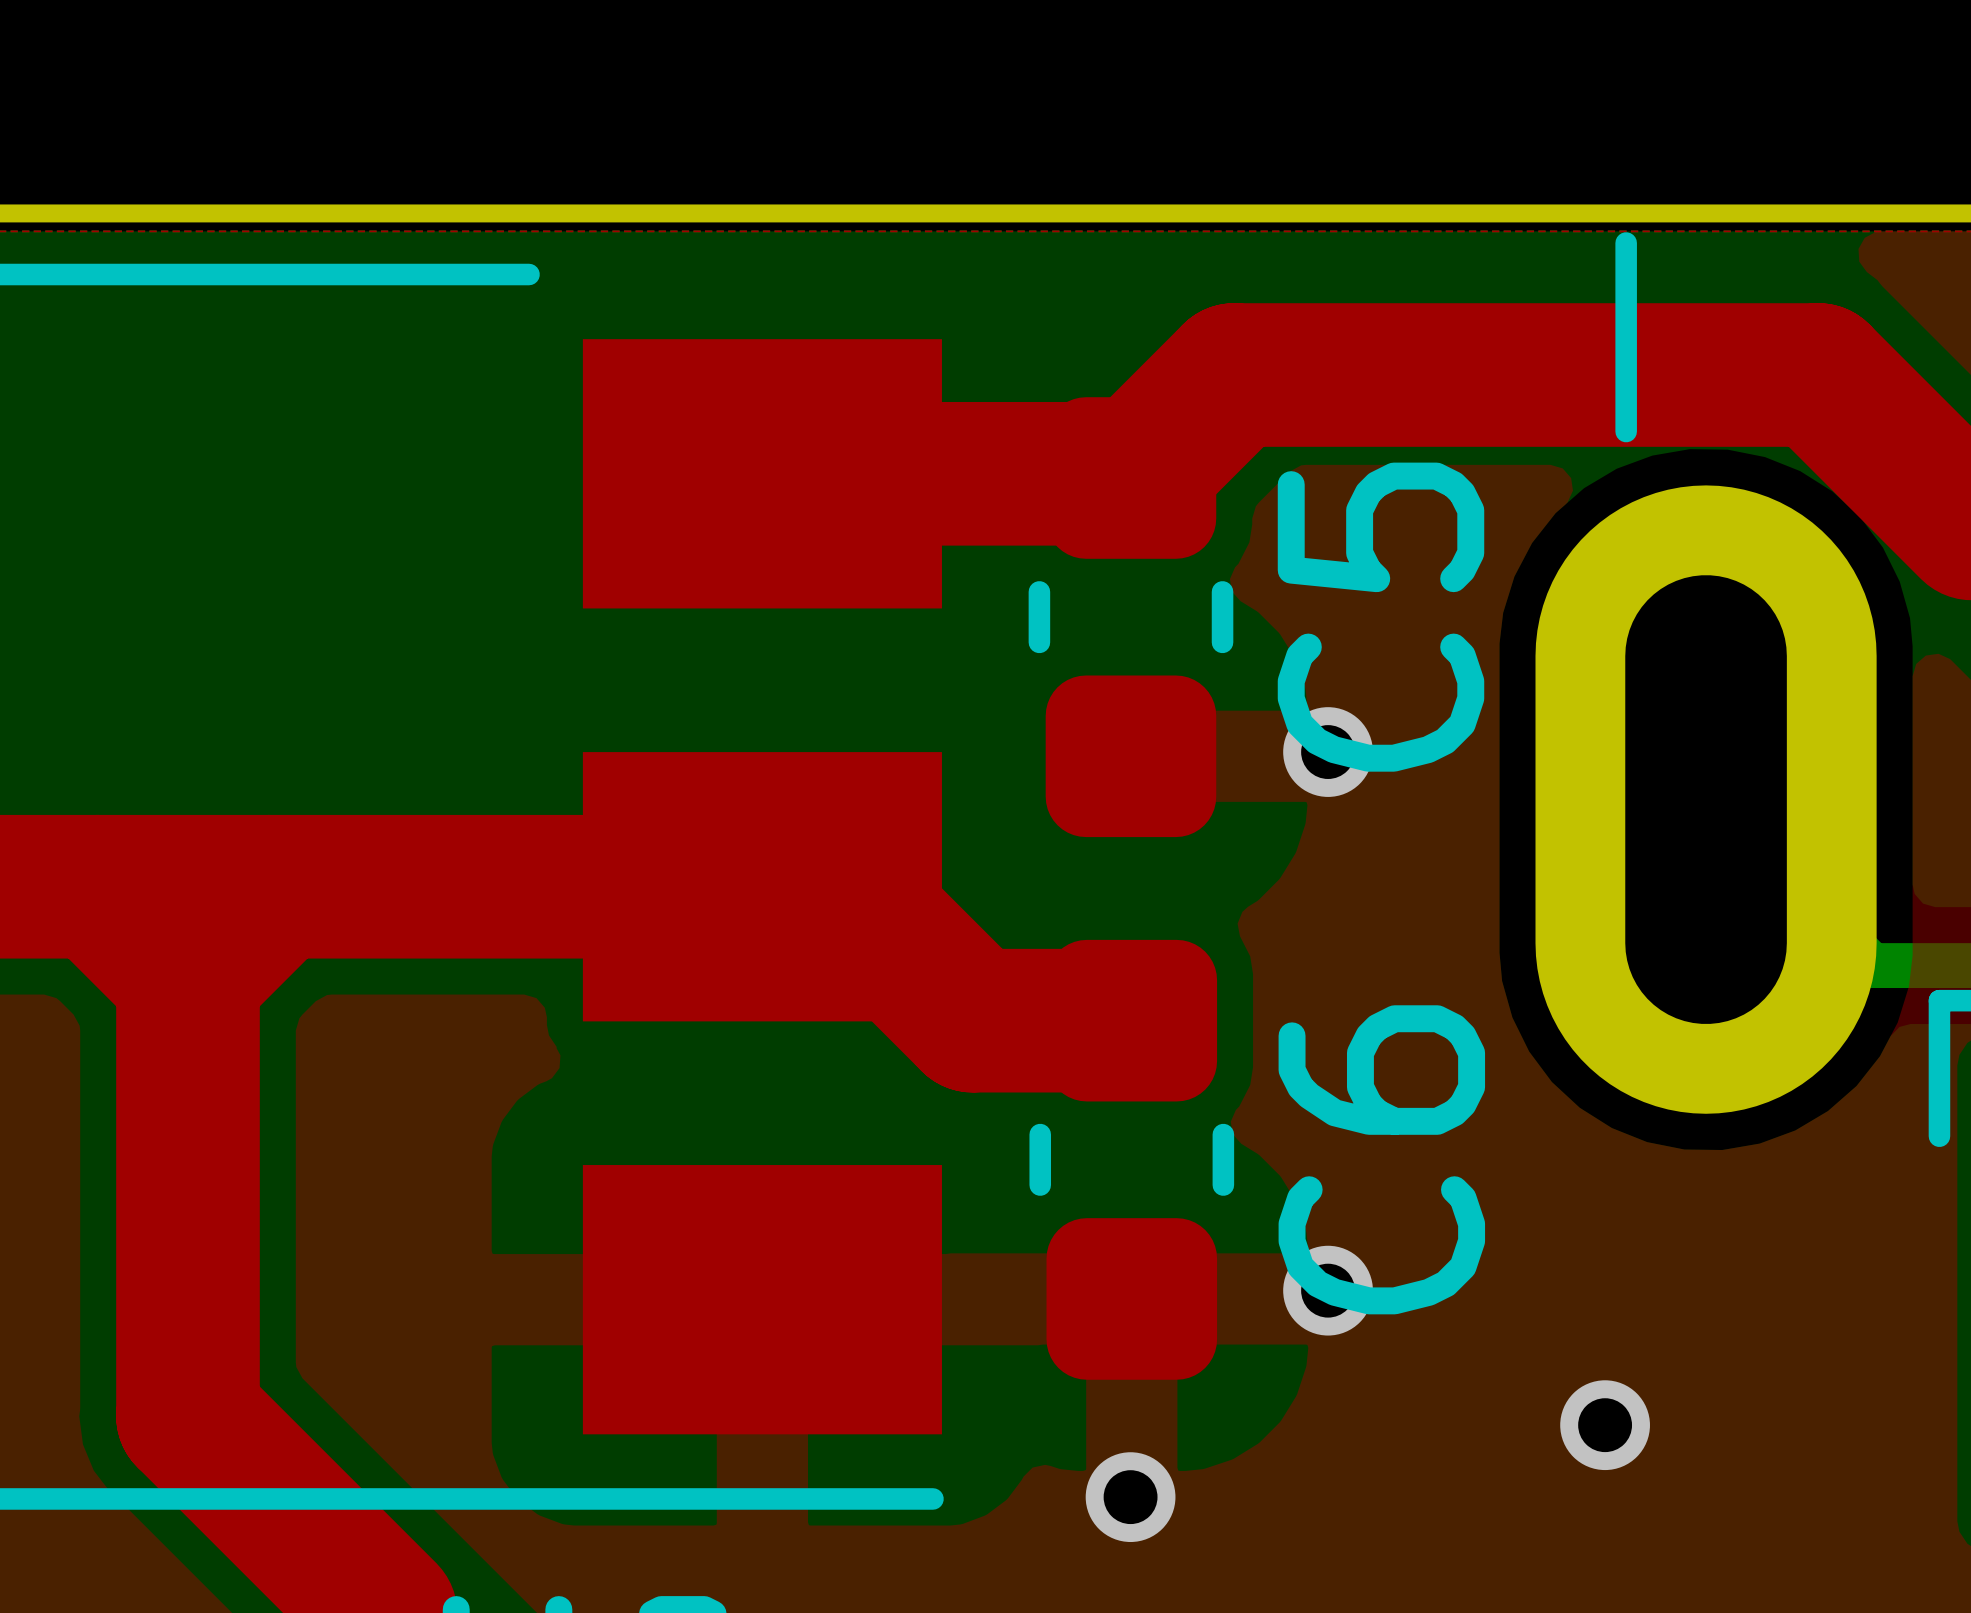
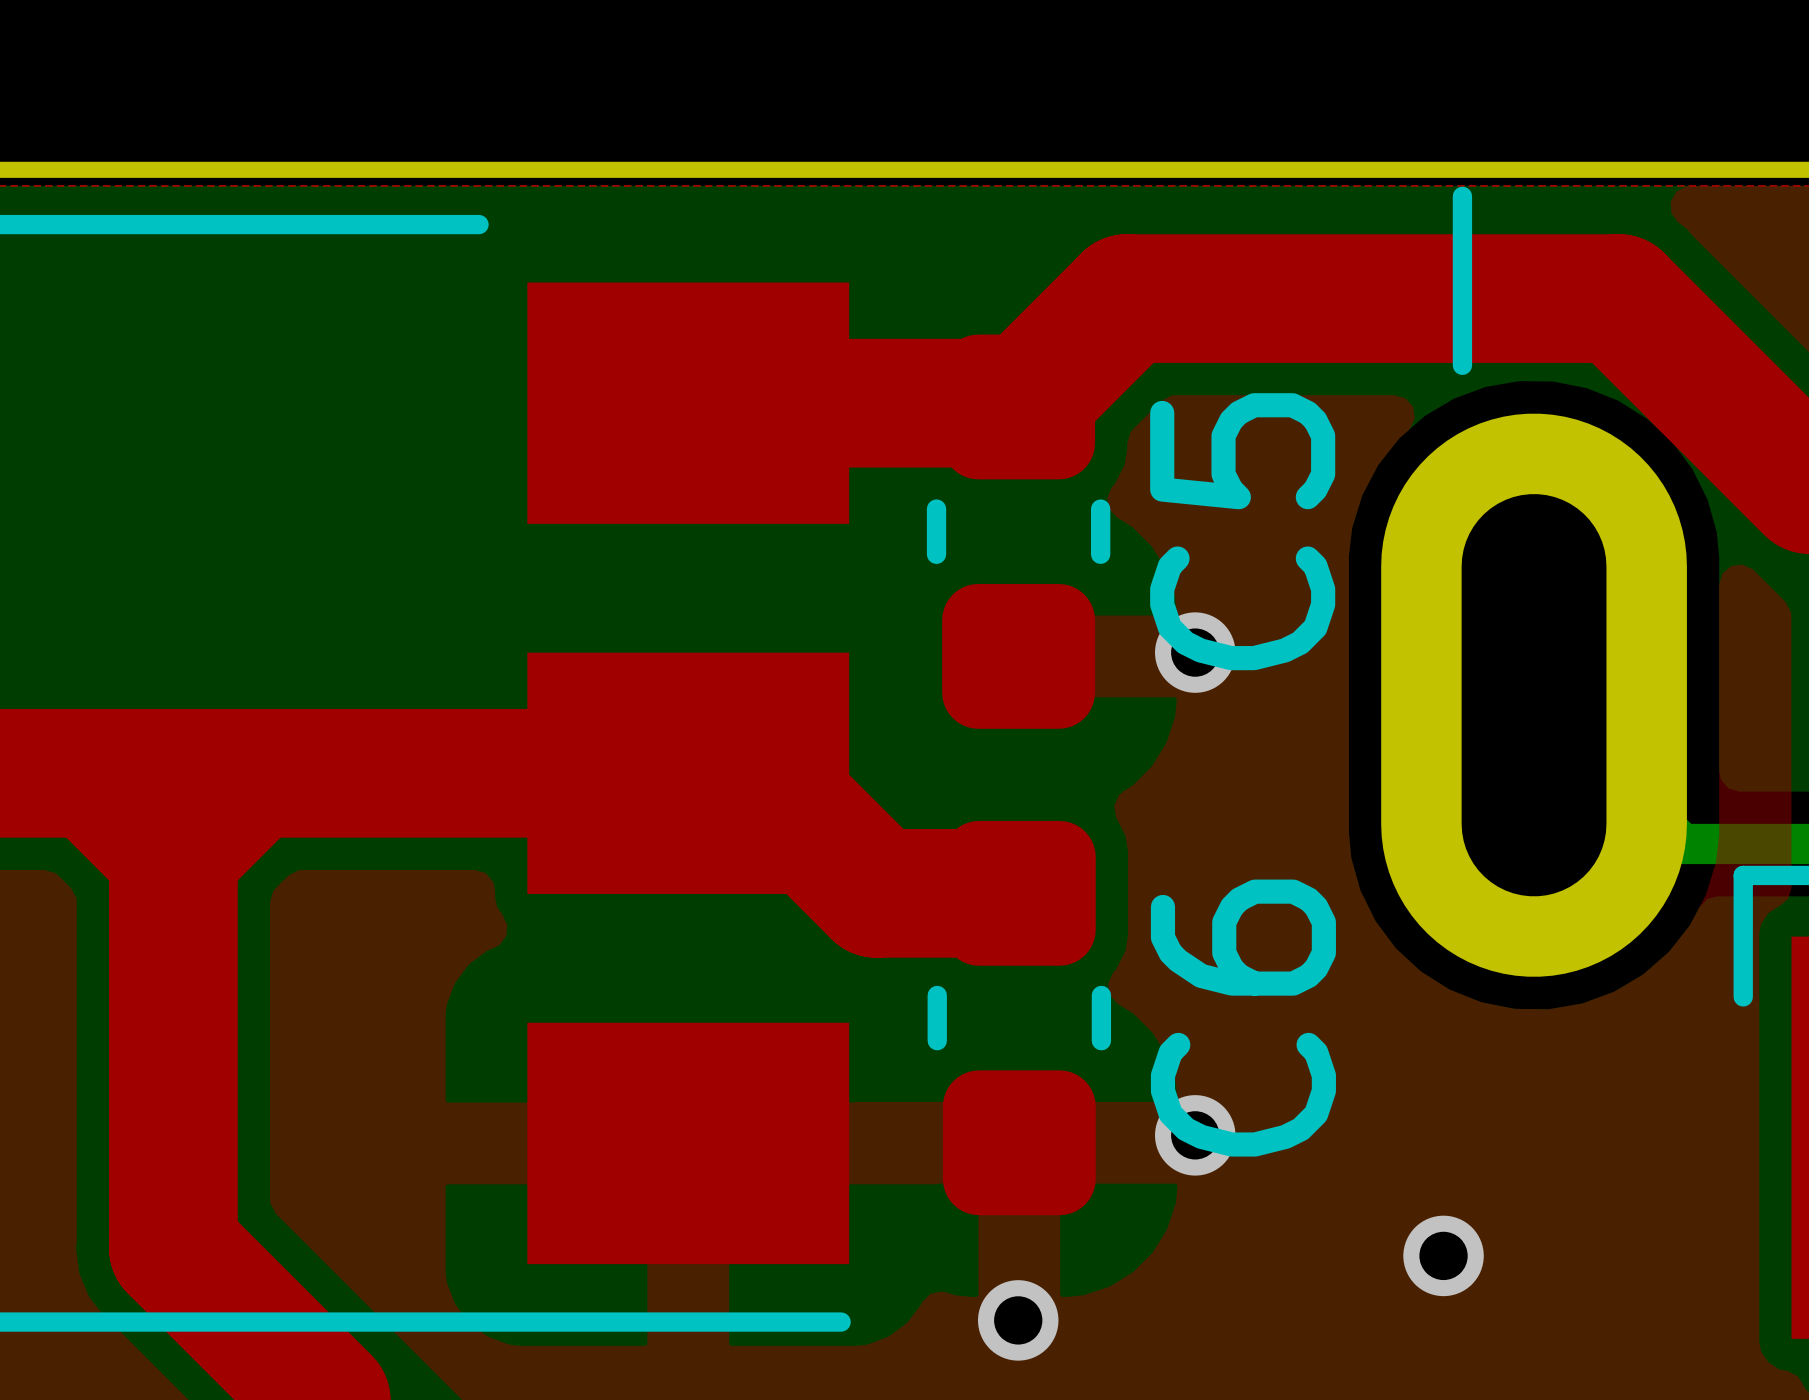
top track: (1233, 375) (1818, 375) -> (1110, 314) (1126, 298) (1618, 298) (1634, 314)

